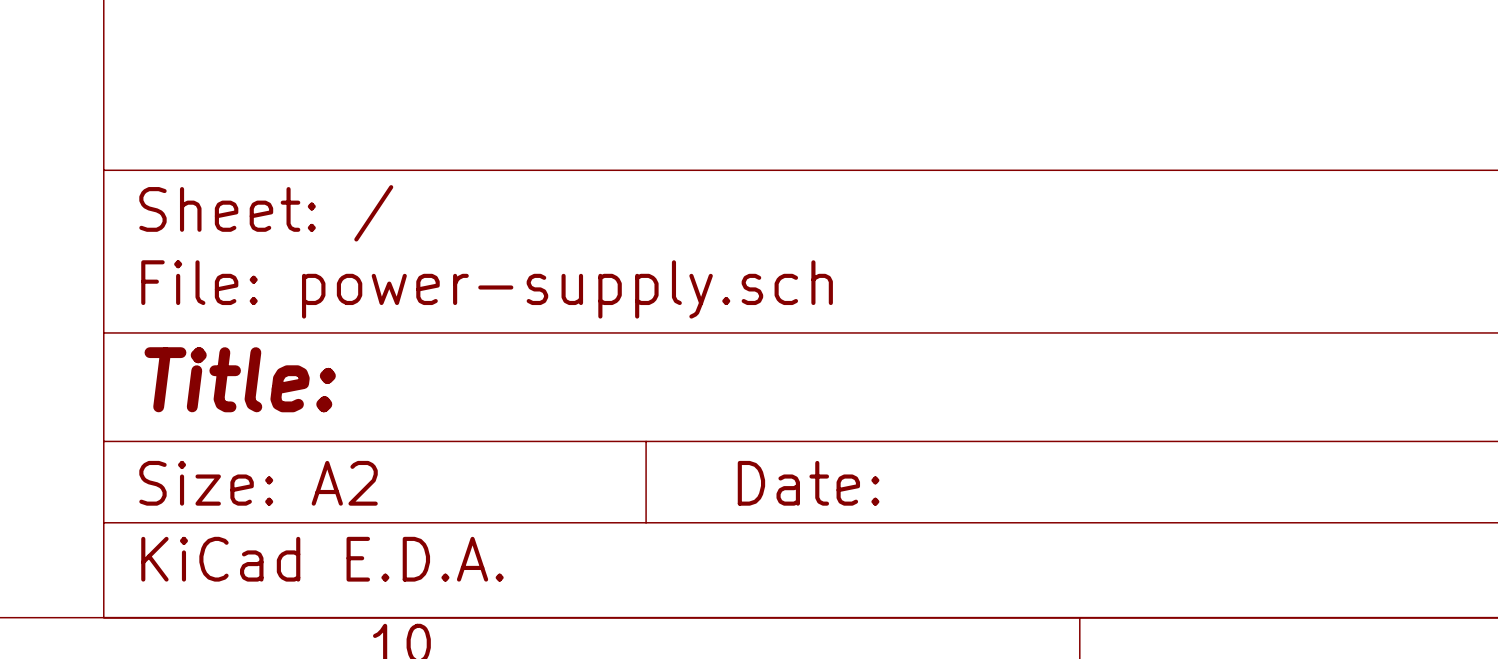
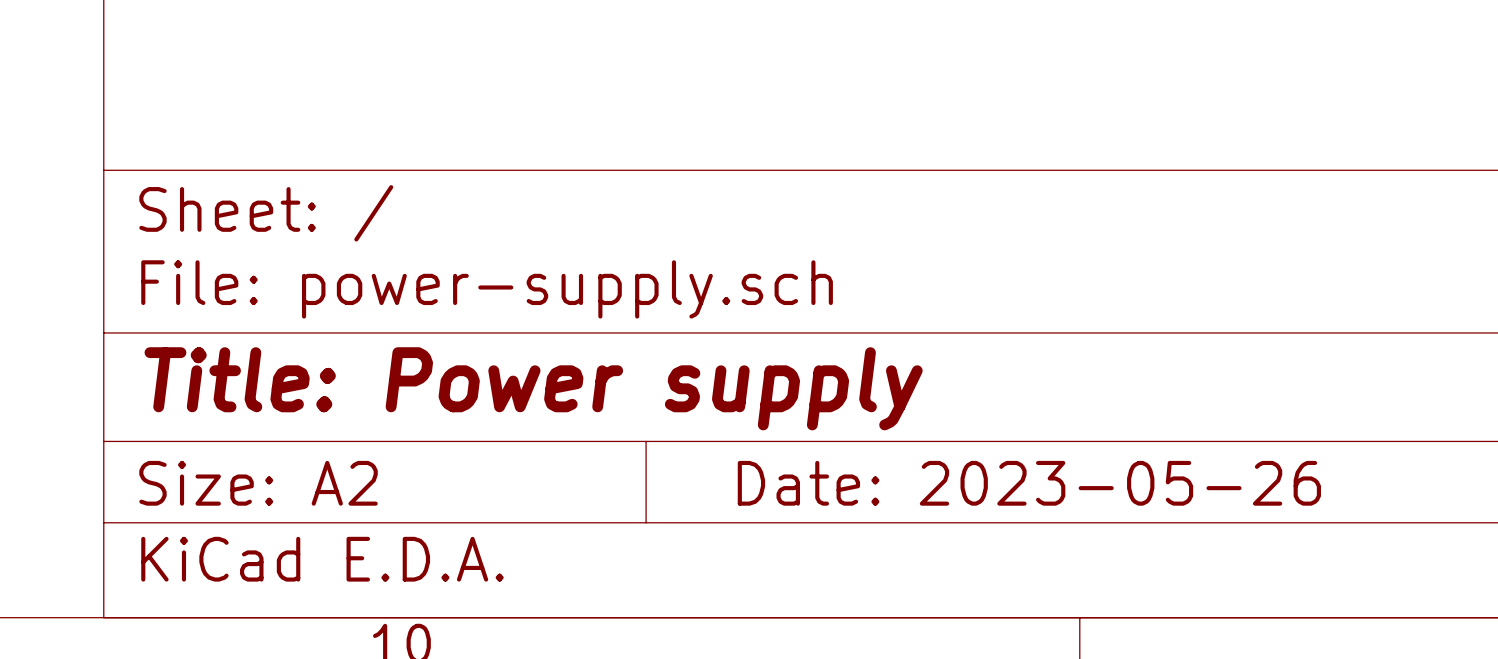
title block: Title: (240, 379) -> Title: Power supply (533, 388)
title block: Date: (808, 483) -> Date: 2023-05-26 (1029, 483)

